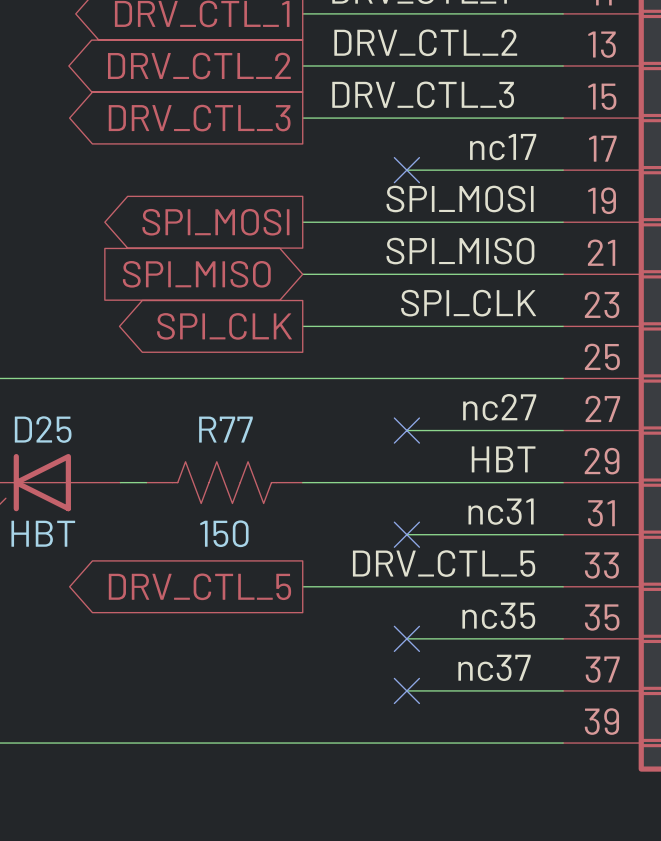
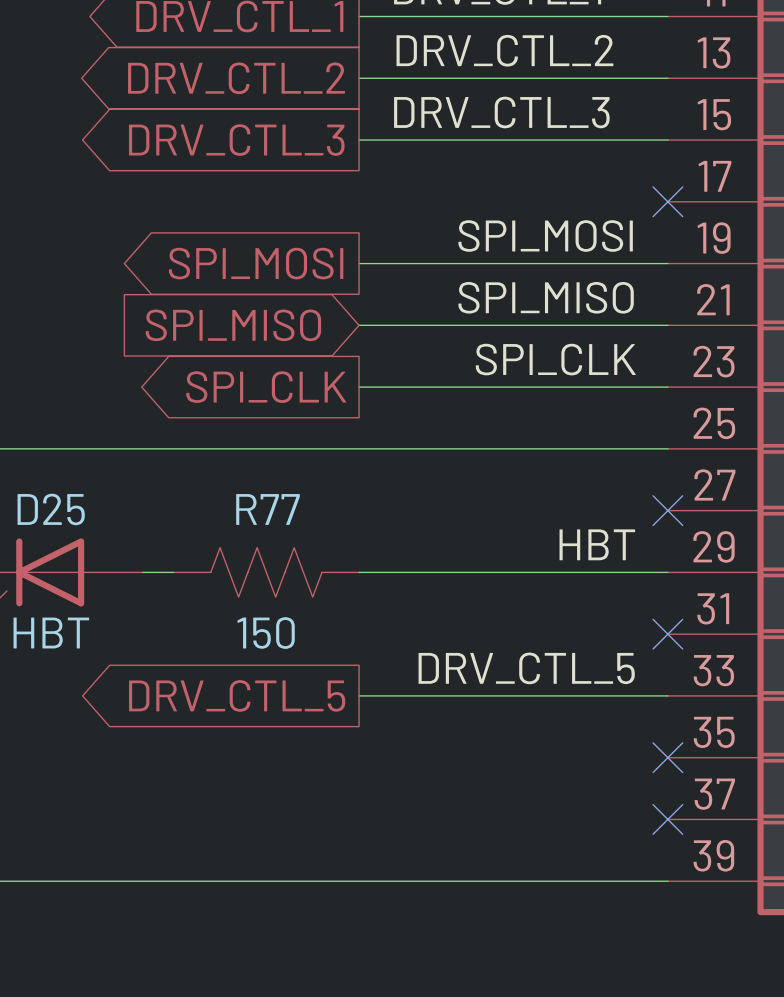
label: nc17 (503, 147) -> none
wire: (406, 170) (563, 170) -> none
no-connect mark: (406, 170) -> none
no-connect mark: none -> (667, 201)
label: nc27 (499, 407) -> none
wire: (406, 430) (563, 430) -> none
no-connect mark: (406, 430) -> none
no-connect mark: none -> (667, 510)
label: nc31 (501, 511) -> none
wire: (406, 534) (563, 534) -> none
no-connect mark: (406, 534) -> none
no-connect mark: none -> (667, 634)
label: nc35 (498, 615) -> none
wire: (406, 638) (563, 638) -> none
no-connect mark: (406, 638) -> none
no-connect mark: none -> (667, 757)
label: nc37 (494, 667) -> none
wire: (406, 690) (563, 690) -> none
no-connect mark: (406, 690) -> none
no-connect mark: none -> (667, 819)

